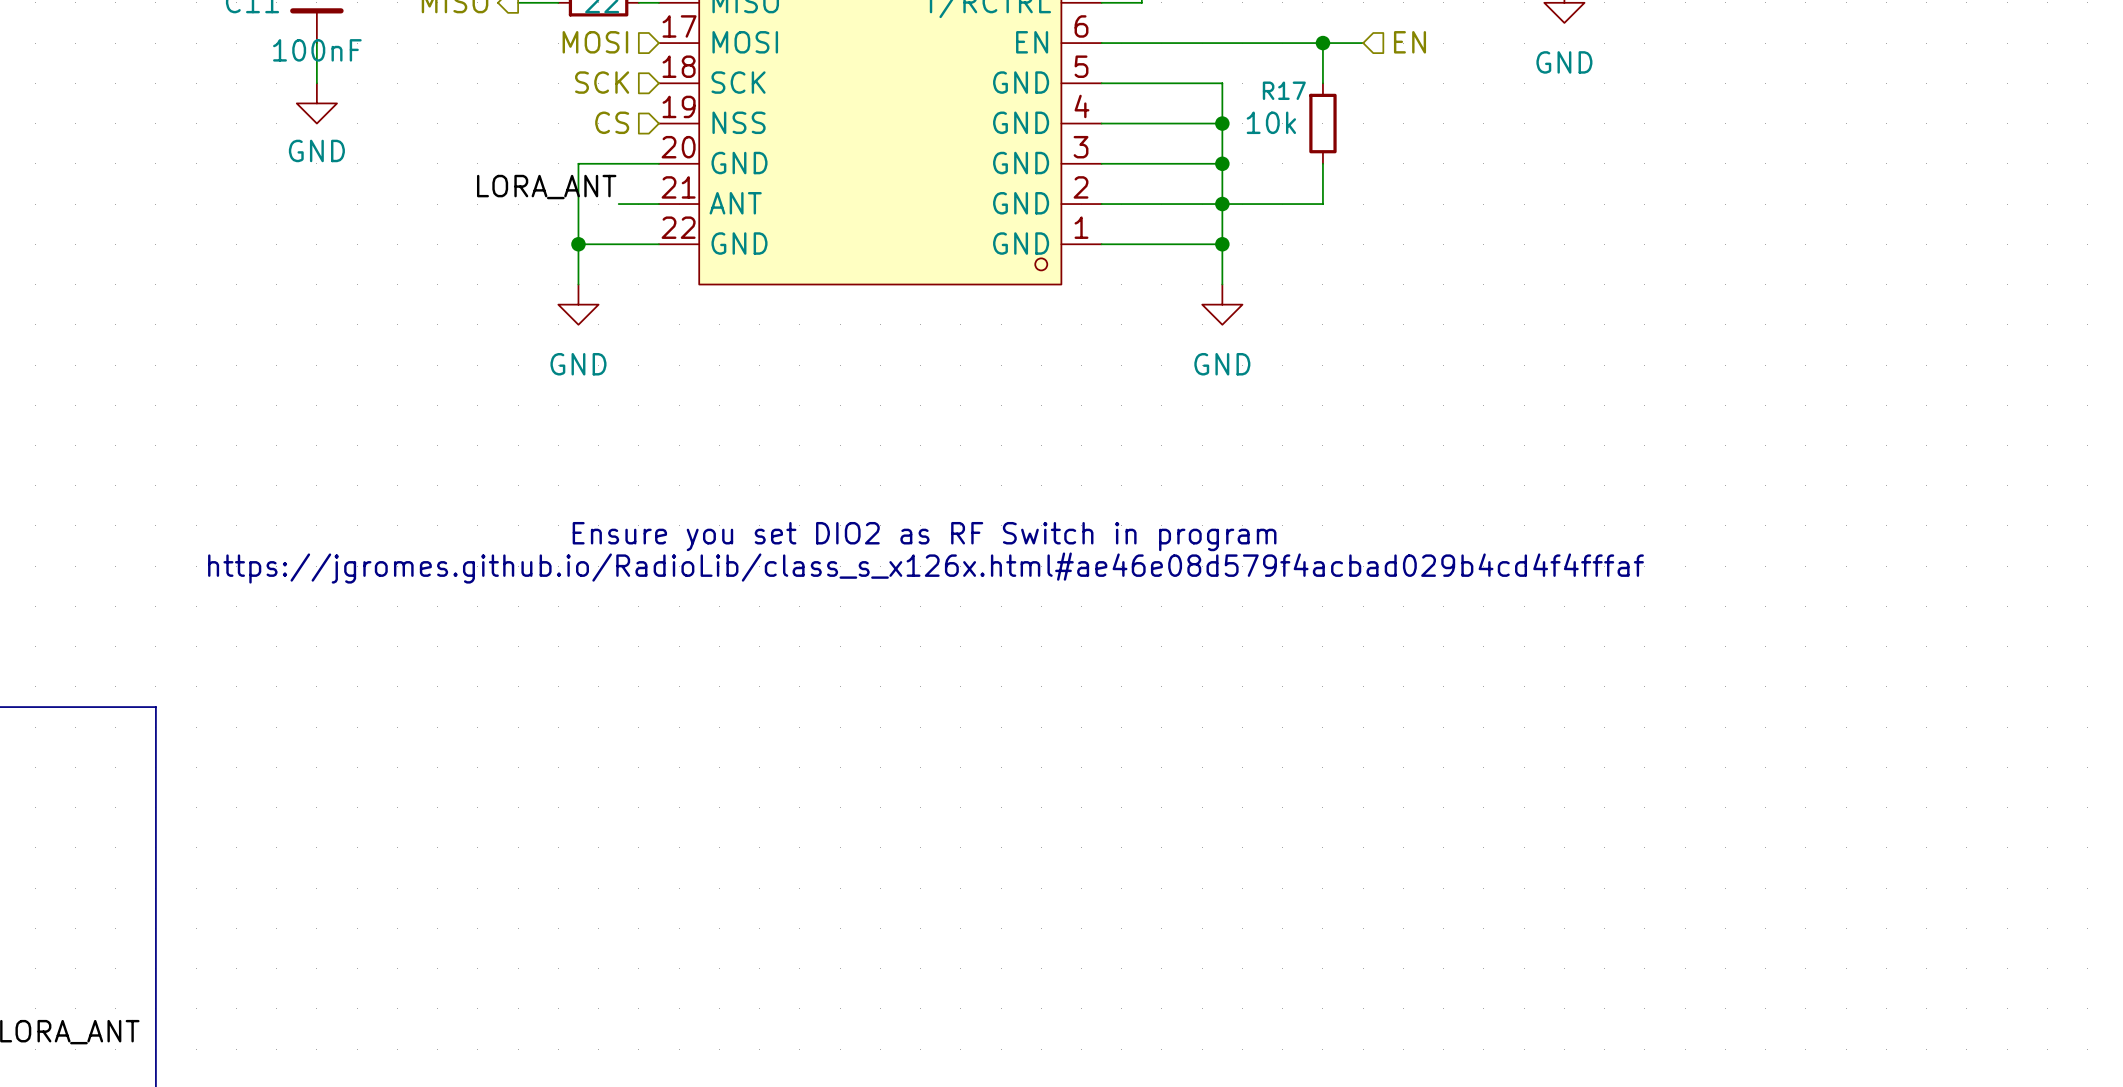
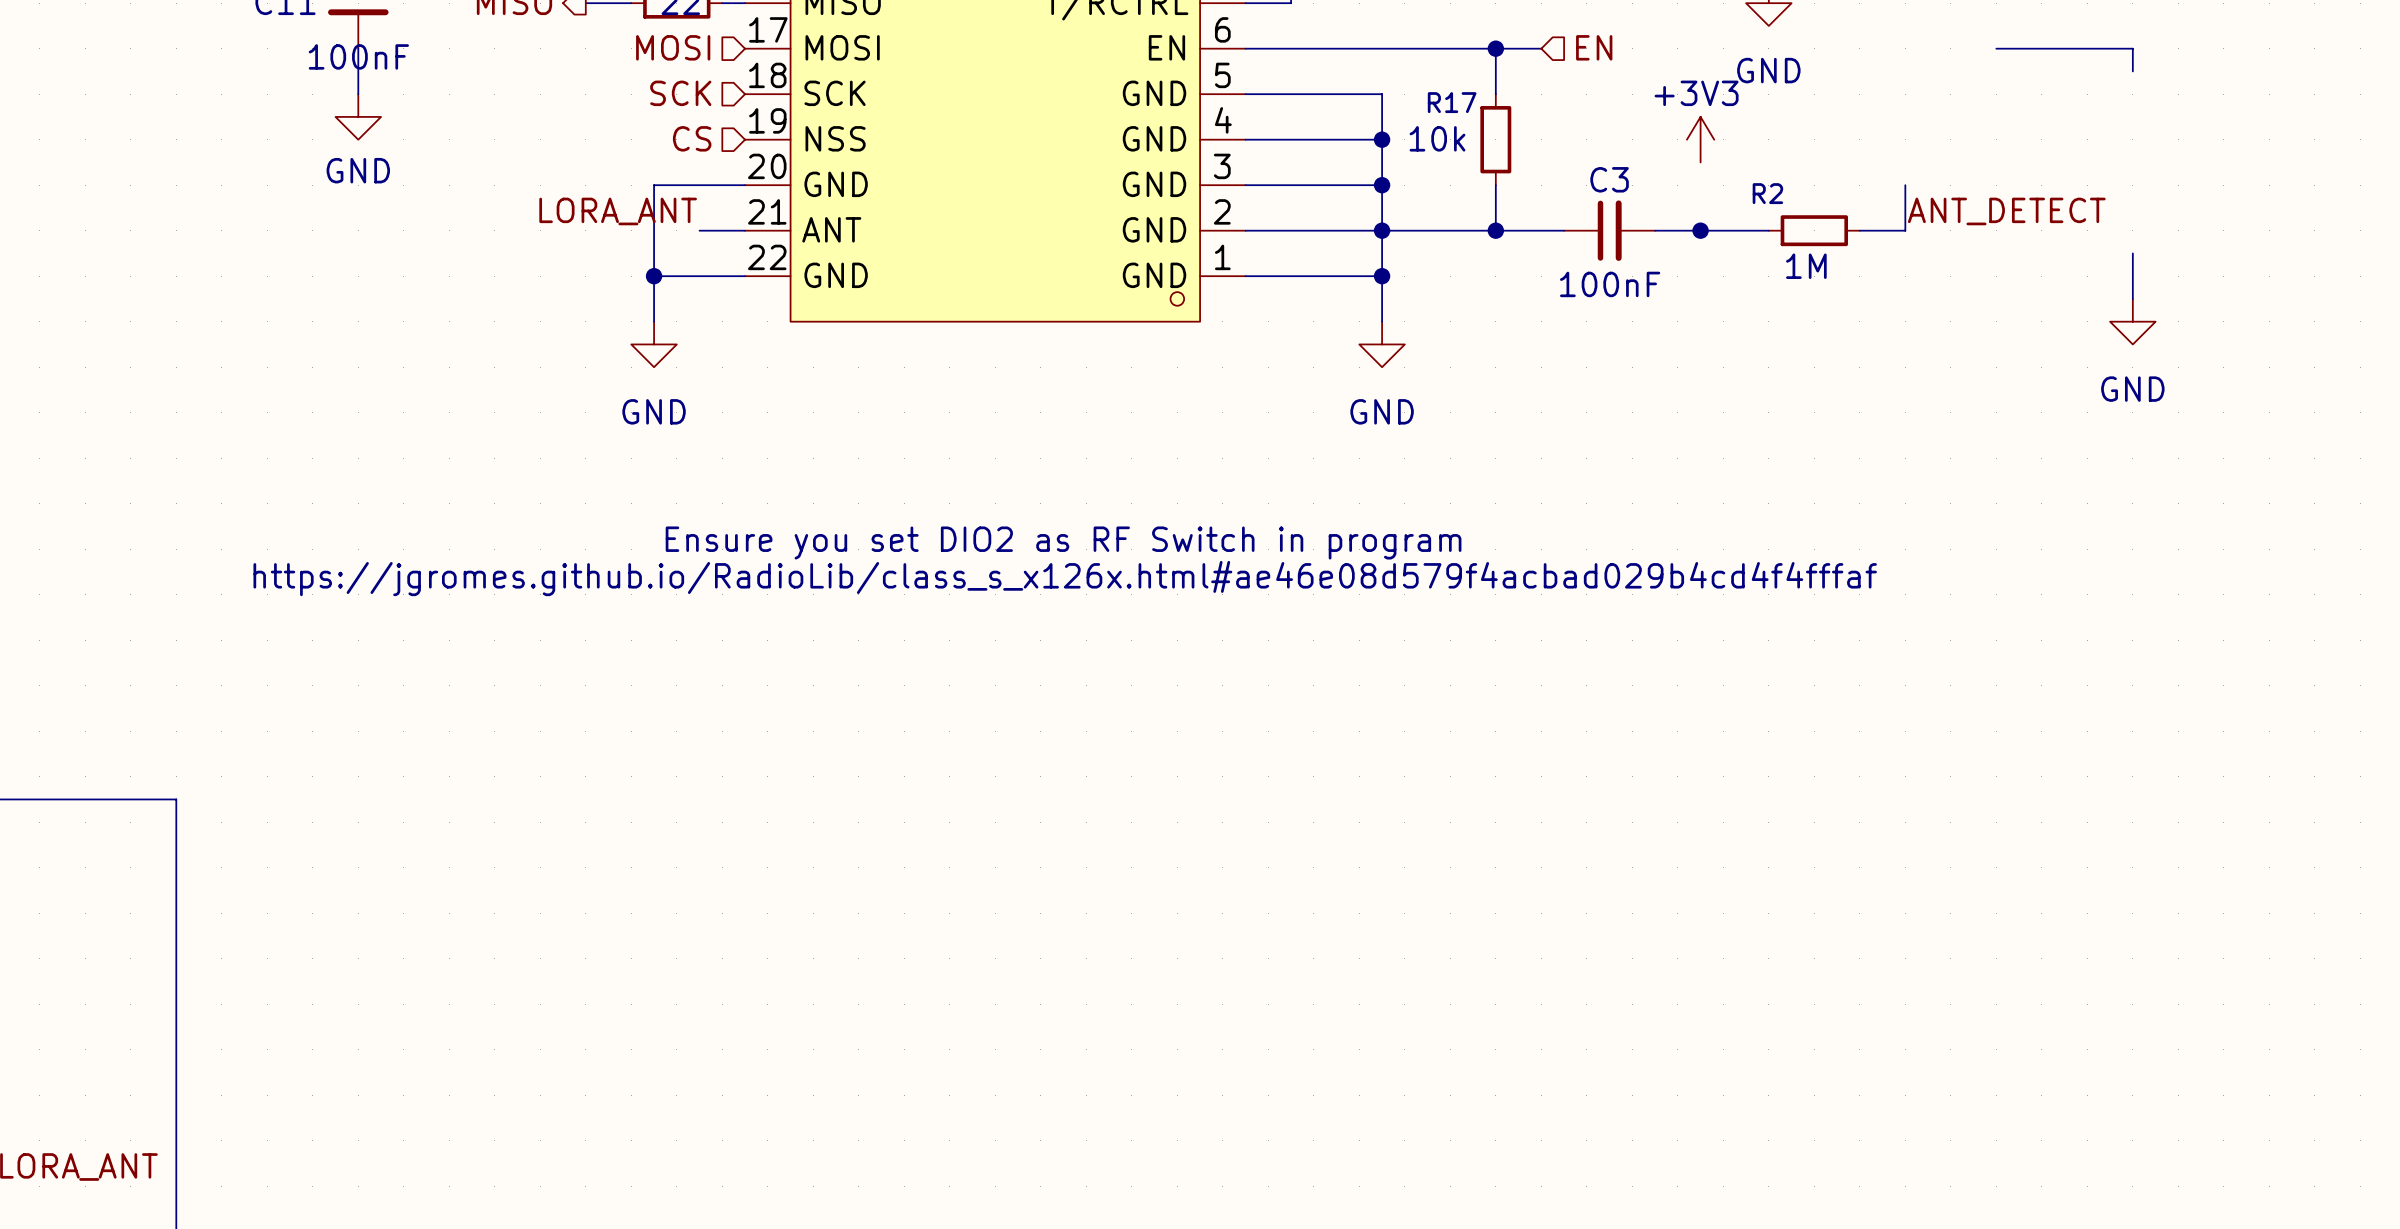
wire: none -> (1996, 48) (2132, 48) (2132, 71)
power symbol: none -> +3V3 (1700, 139)
wire: none -> (1905, 185) (1905, 230) (1859, 230)
label: none -> ANT_DETECT (2006, 211)
wire: none -> (1495, 230) (1564, 230)
junction: none -> (1495, 230)
C3: none -> 100nF (1609, 230)
wire: none -> (1655, 230) (1768, 230)
junction: none -> (1700, 230)
R2: none -> 1M (1814, 230)
wire: none -> (2132, 253) (2132, 298)
power symbol: none -> GND (2132, 321)
text position: Ensure you set DIO2 as RF Switch in program (924, 536) -> Ensure you set DIO2 as RF Switch in program (1063, 542)
text position: https://jgromes.github.io/RadioLib/class_s_x126x.html#ae46e08d579f4acbad029b4cd4f4fffaf (926, 568) -> https://jgromes.github.io/RadioLib/class_s_x126x.html#ae46e08d579f4acbad029b4cd4f4fffaf (1065, 578)

